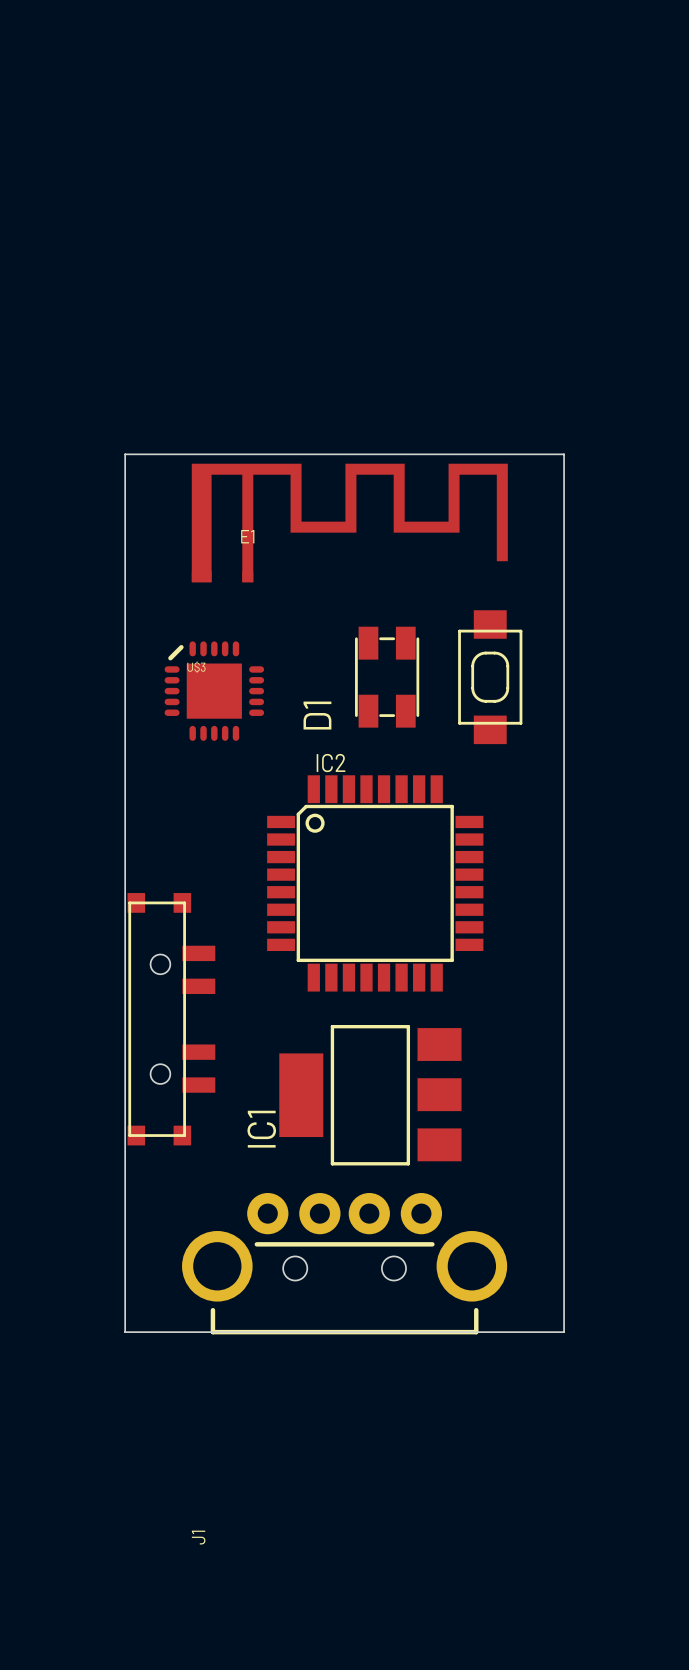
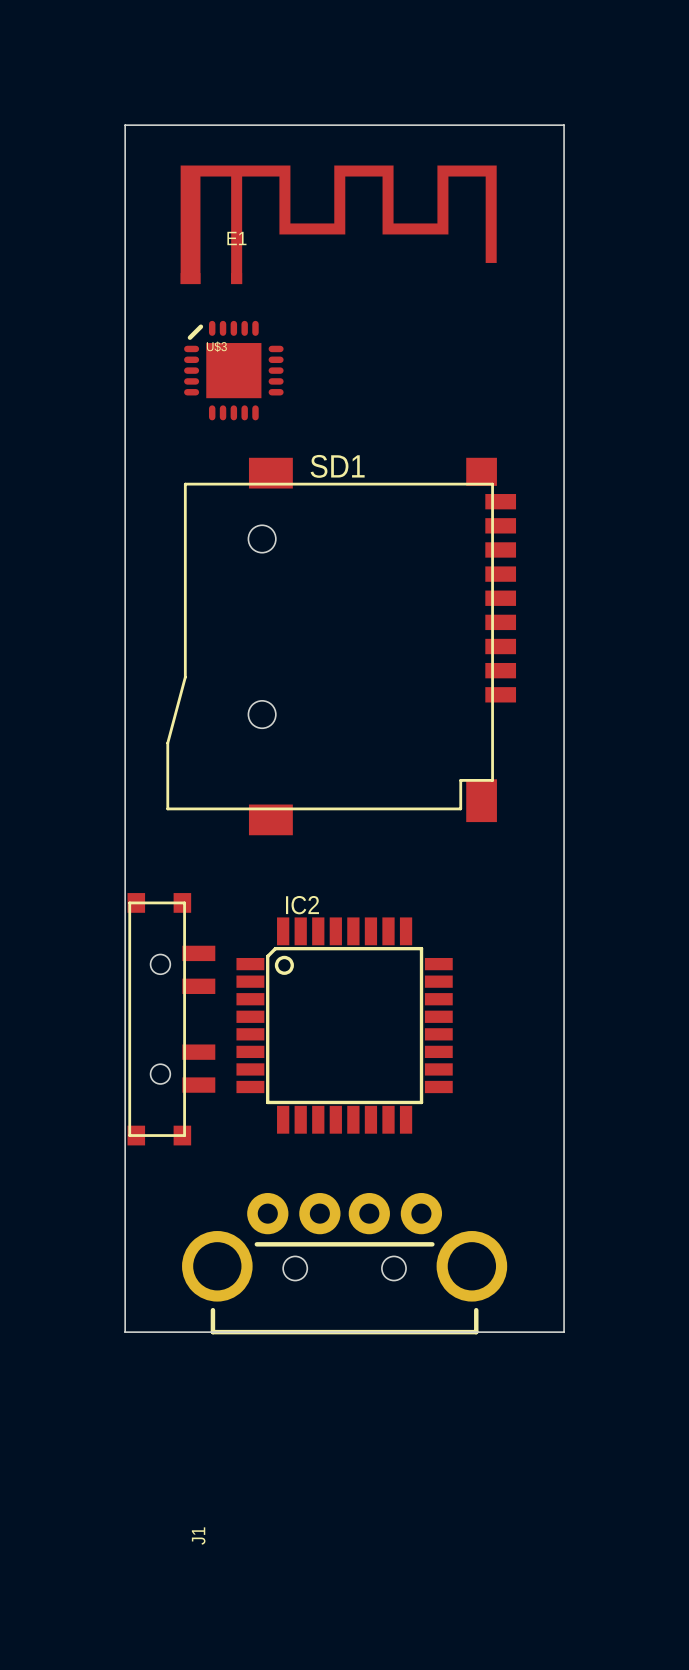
board edge: (125, 454) (564, 454) -> (125, 454) (125, 125) (564, 125) (564, 454)
E1 position: (349, 522) -> (338, 224)
SD1: none -> (341, 646)
D1: (387, 677) -> none
part: (490, 677) -> none
U$3 position: (214, 691) -> (233, 370)
IC2 position: (375, 883) -> (344, 1025)
IC1: (370, 1095) -> none

